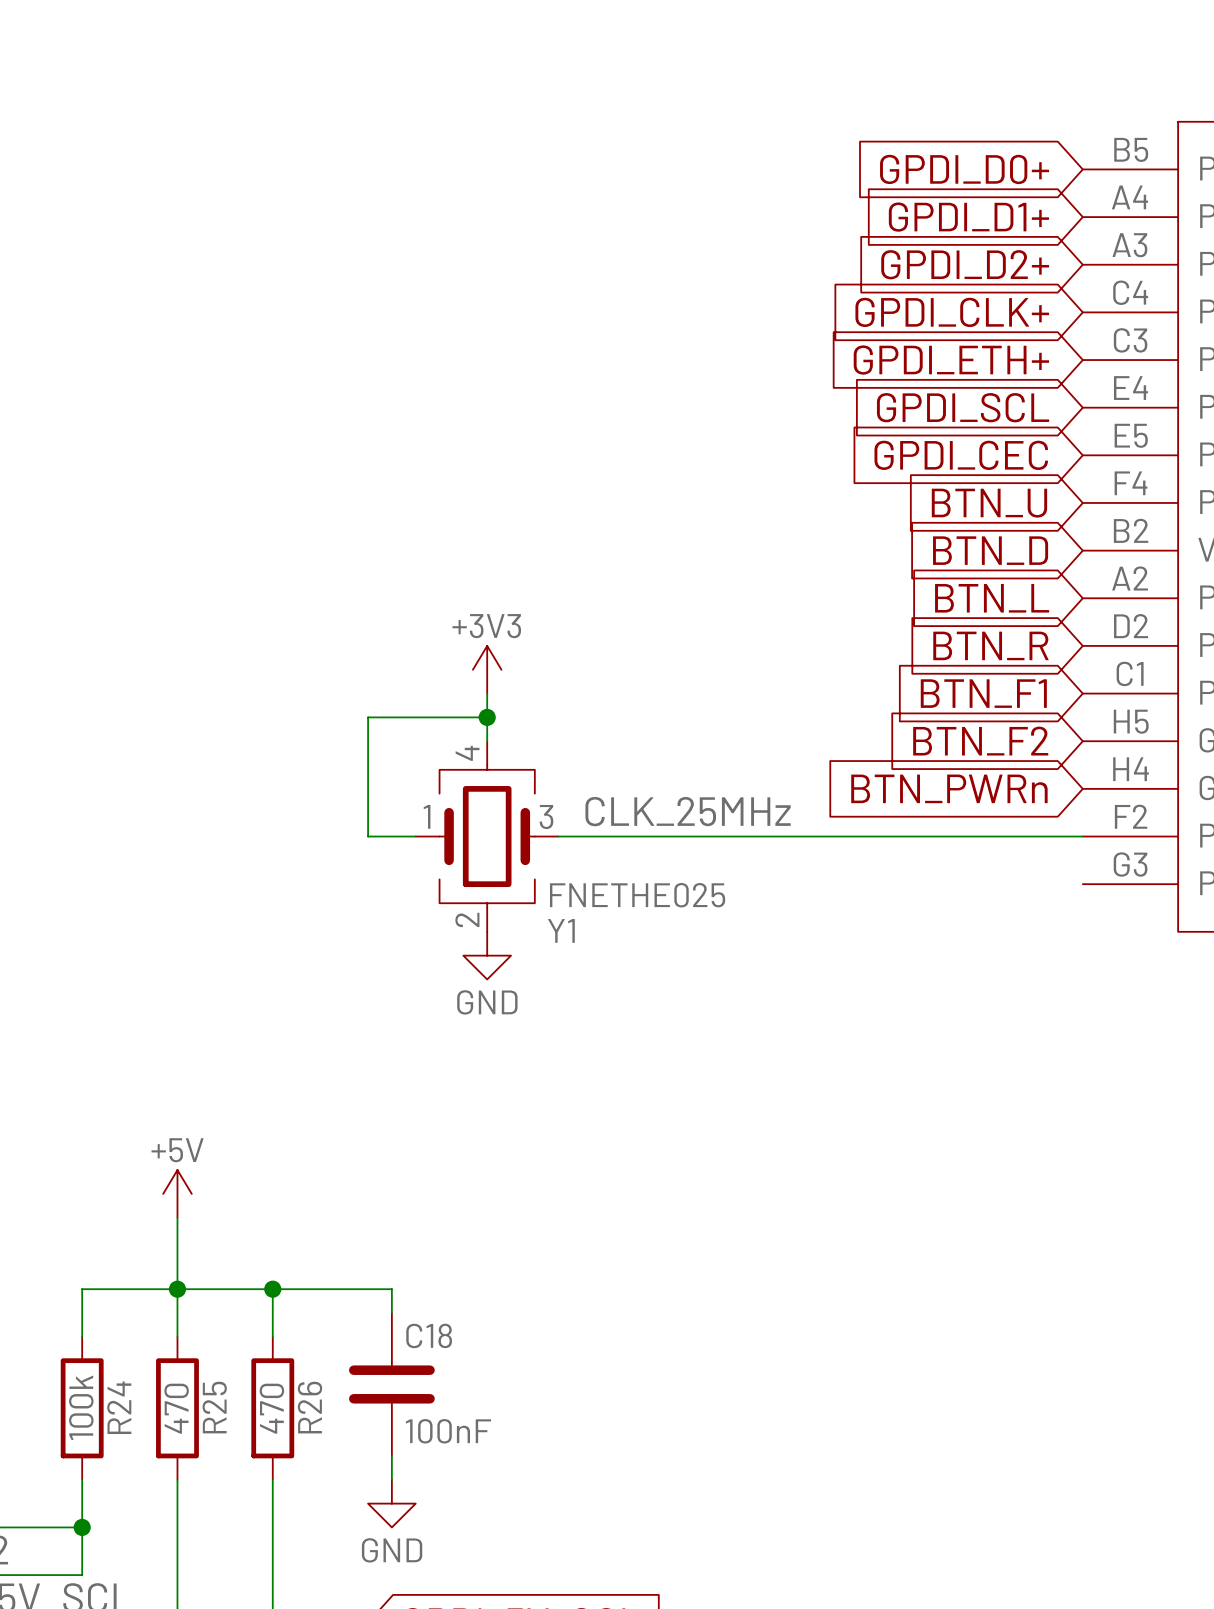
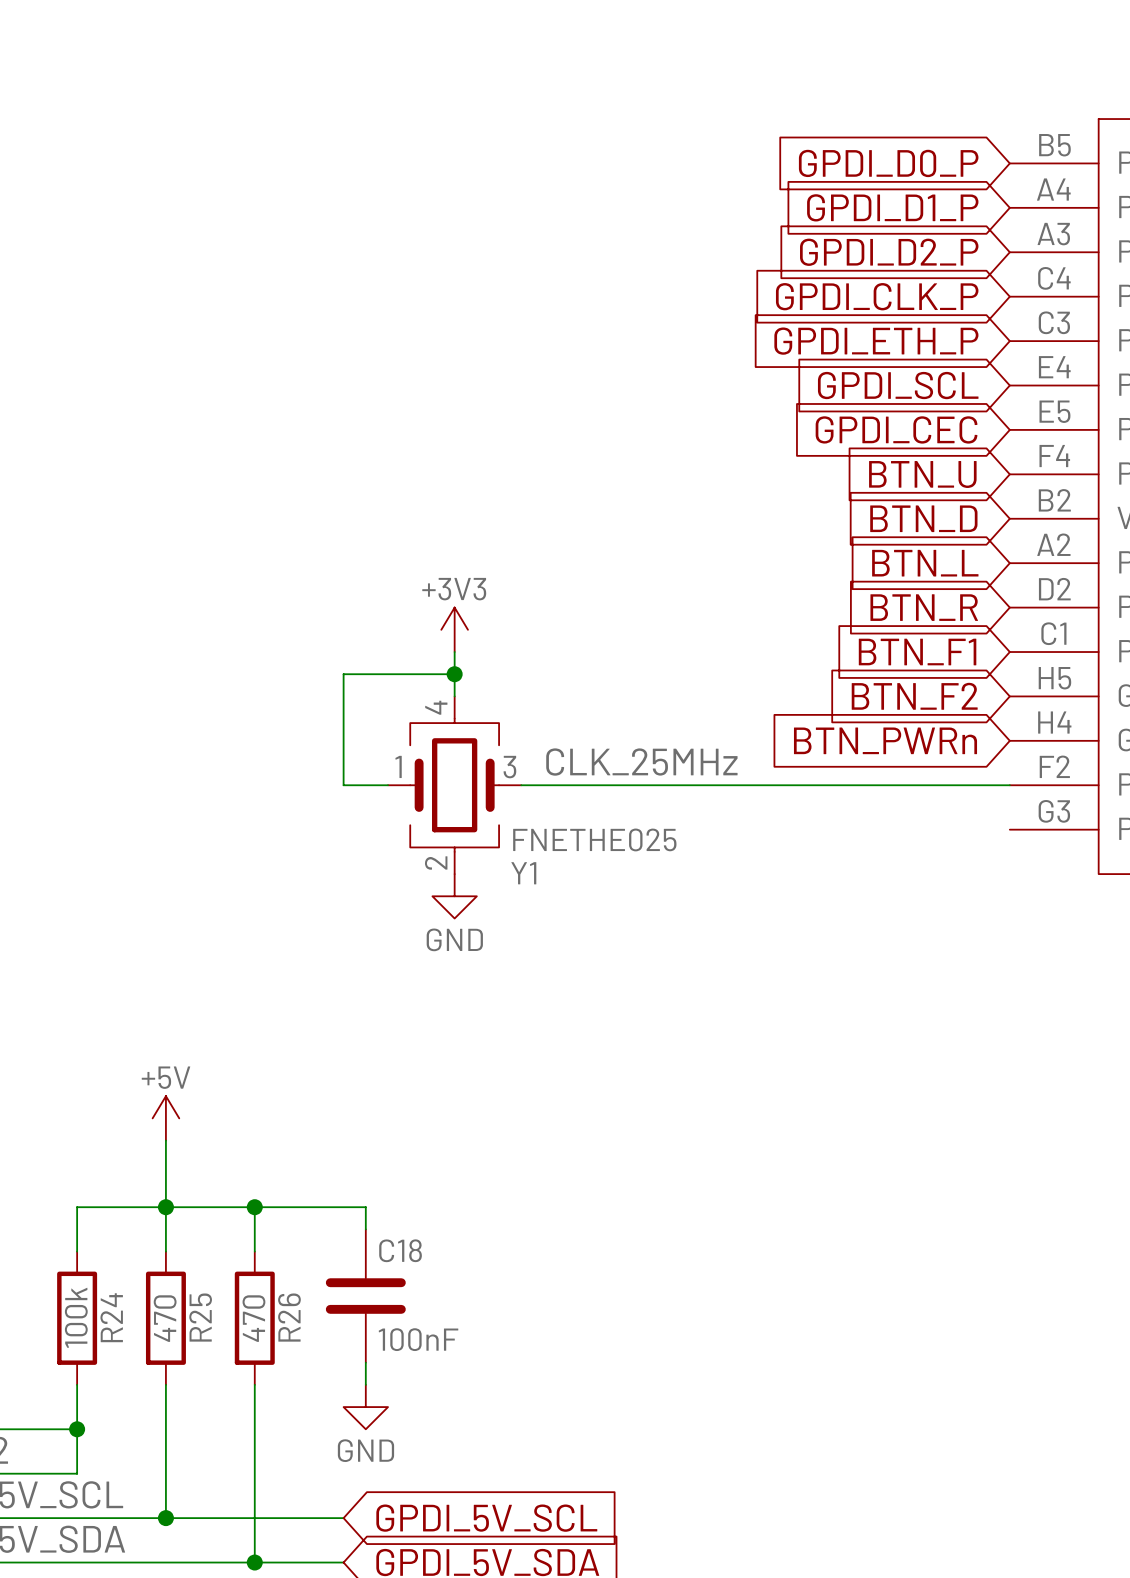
global label: GPDI_D0+ (964, 169) -> GPDI_D0_P (888, 163)
global label: GPDI_D1+ (968, 217) -> GPDI_D1_P (892, 207)
global label: GPDI_D2+ (965, 264) -> GPDI_D2_P (889, 252)
global label: GPDI_CLK+ (952, 312) -> GPDI_CLK_P (877, 296)
global label: GPDI_ETH+ (951, 360) -> GPDI_ETH_P (876, 341)

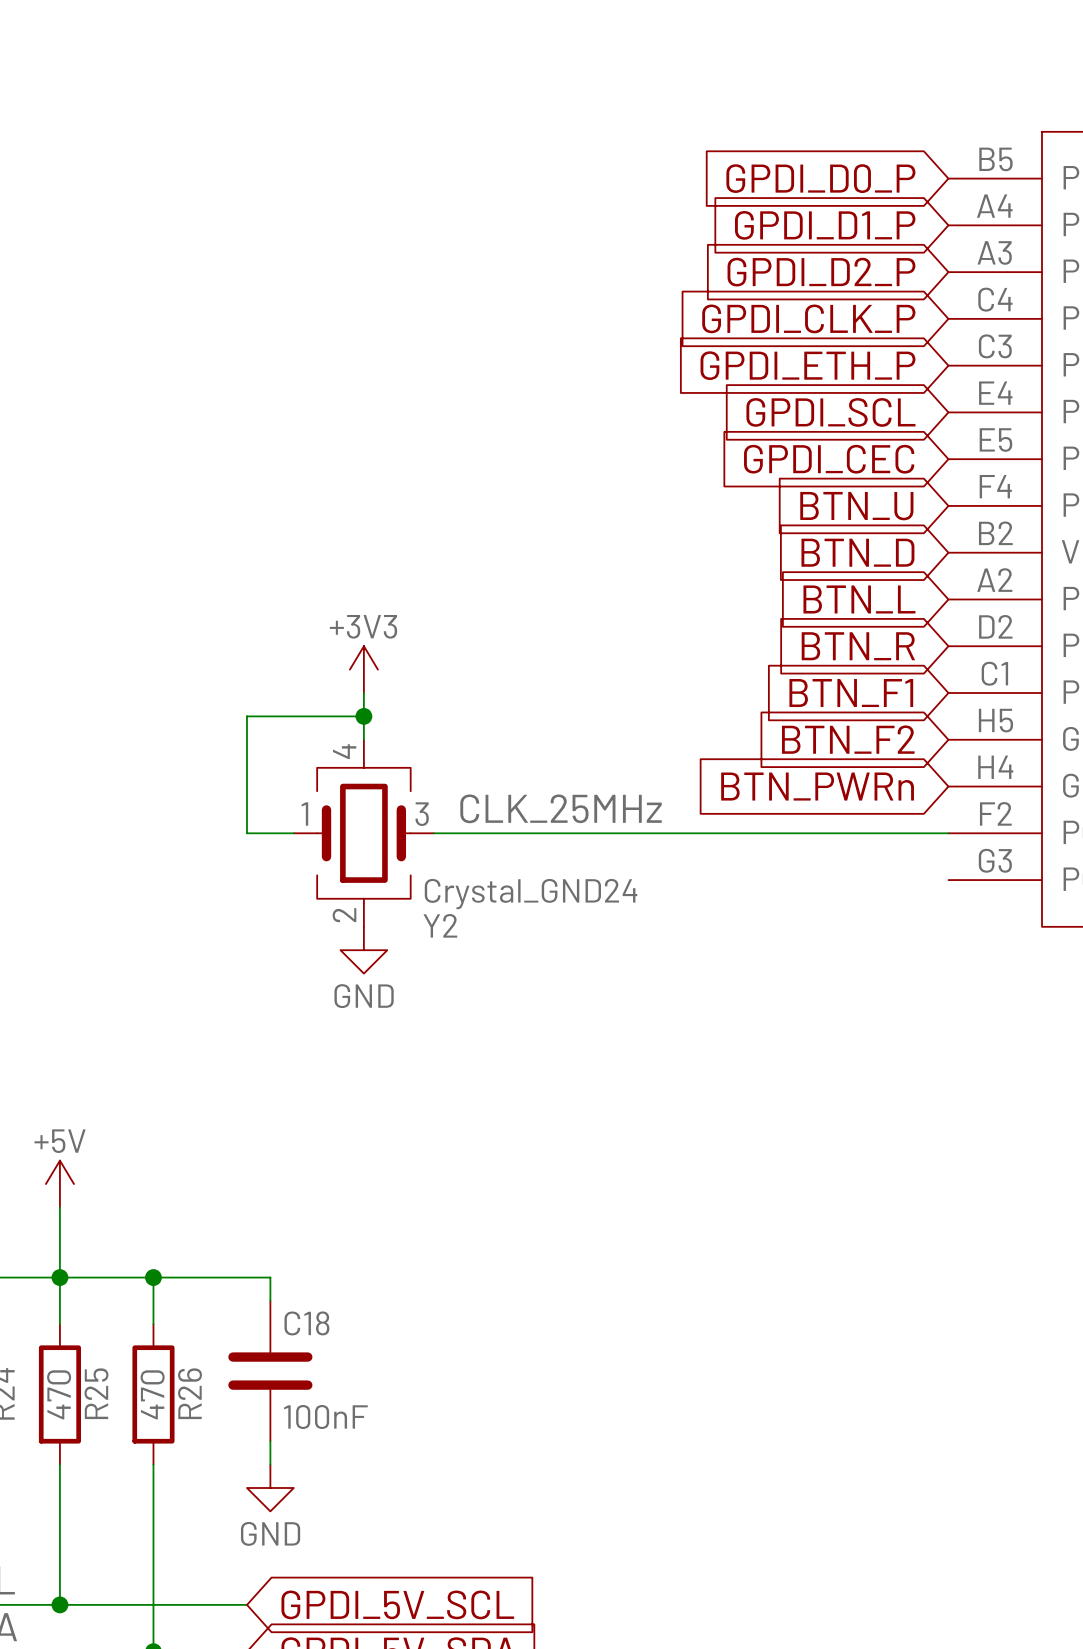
Y1 value: FNETHE025 (594, 839) -> Crystal_GND24 (531, 894)
Y1 name: Y1 (523, 873) -> Y2 (440, 925)

